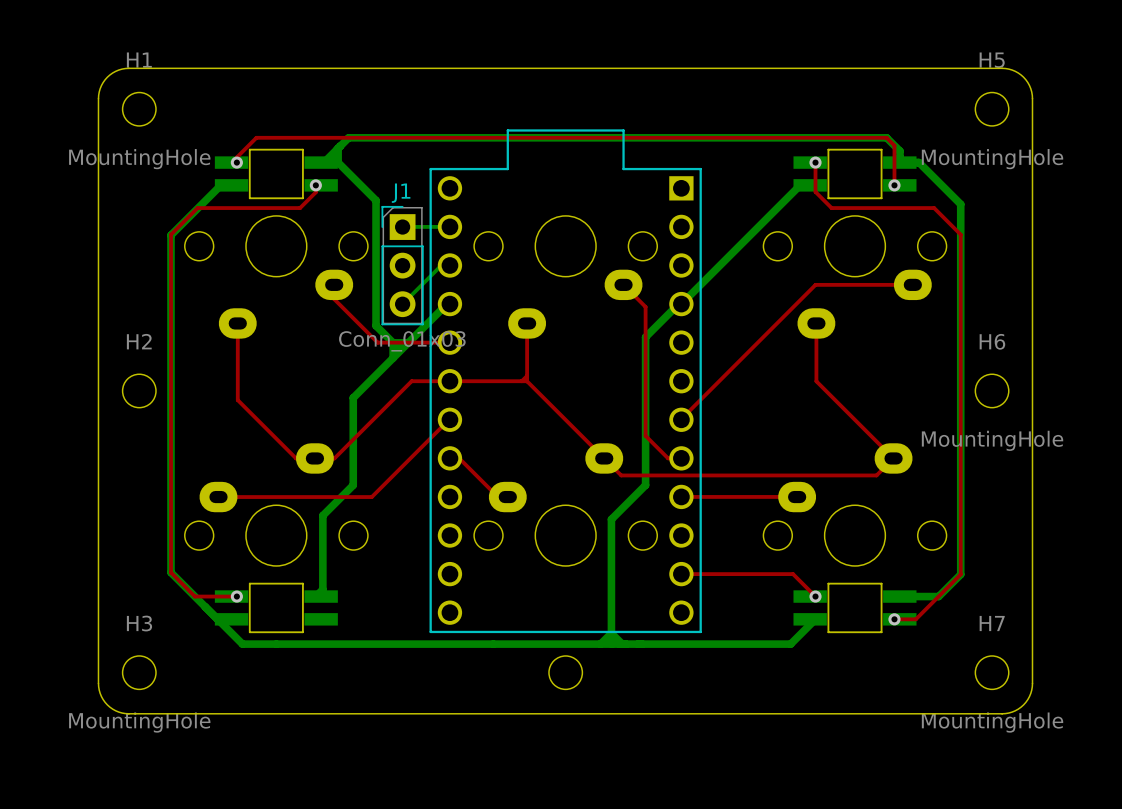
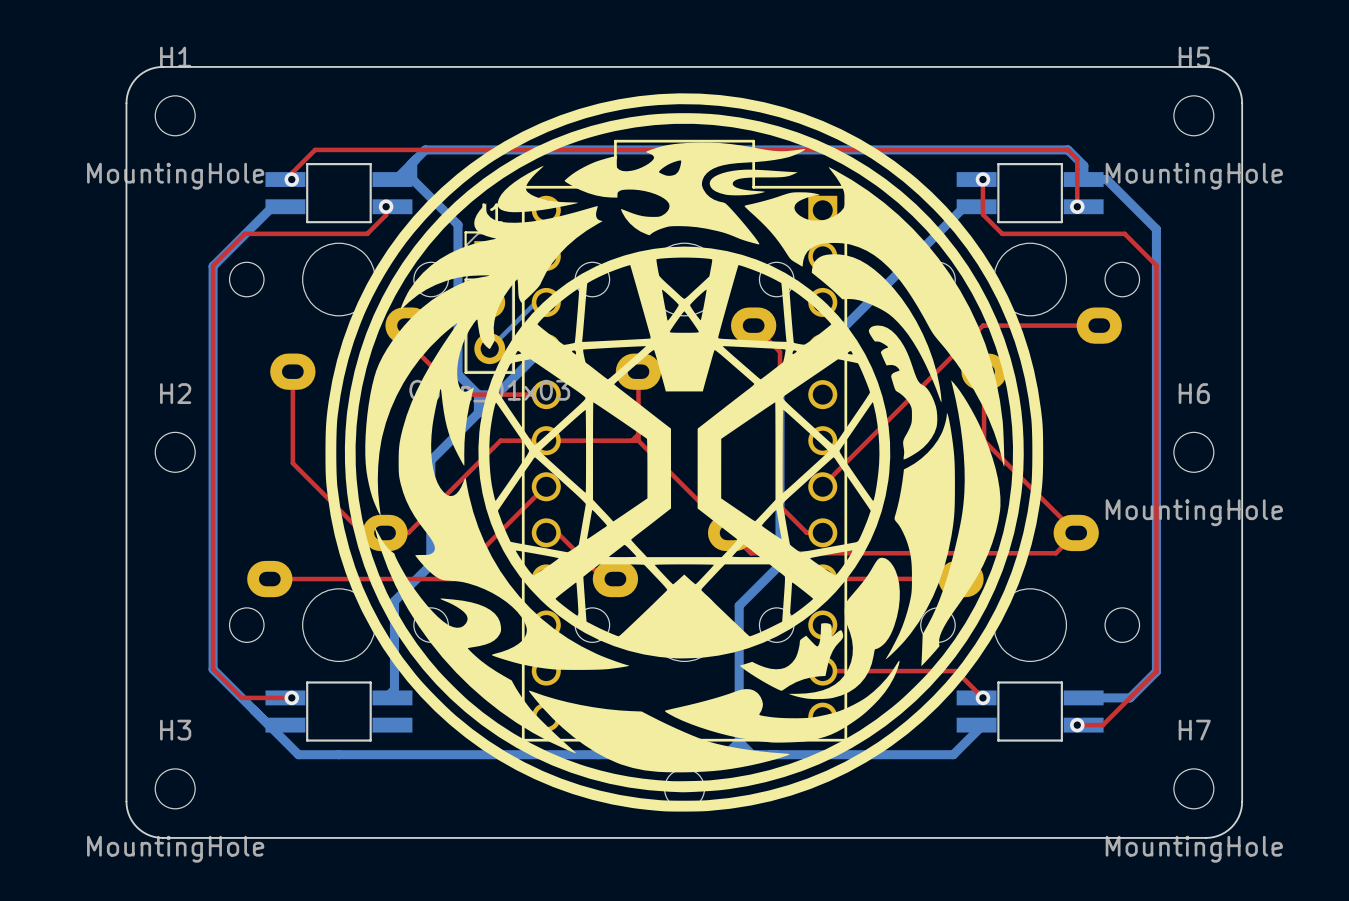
drawing: none -> [325, 93, 1044, 812]

